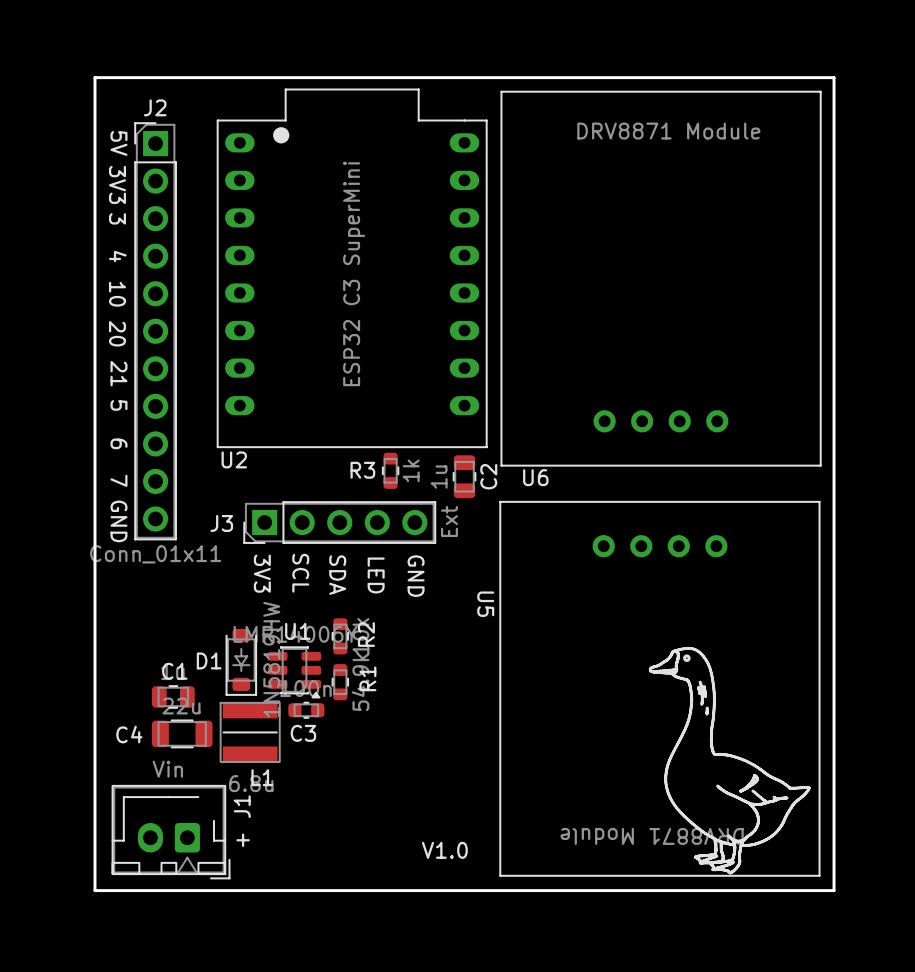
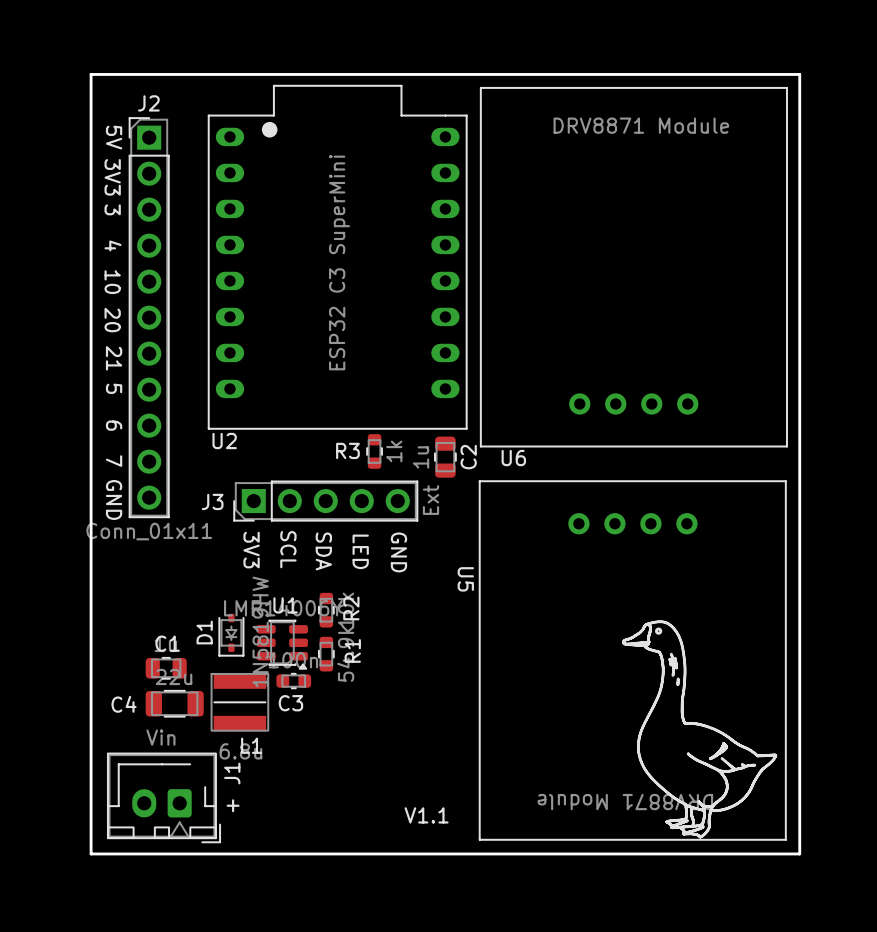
D1 footprint: [225, 628, 257, 696] -> [218, 613, 245, 657]
D1 name rotation: 0° (209, 660) -> 90° counterclockwise (204, 632)
text: V1.0 (444, 850) -> V1.1 (426, 815)

